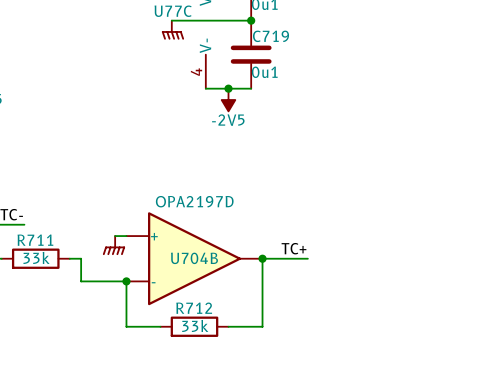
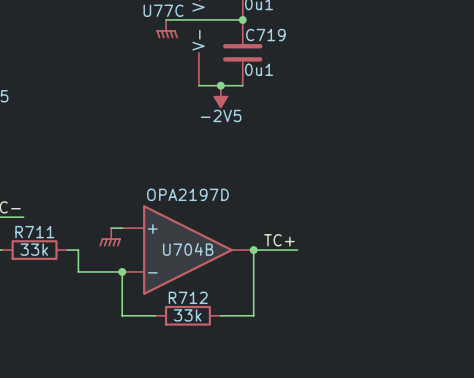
U77C pin number: 4 (196, 72) -> none

